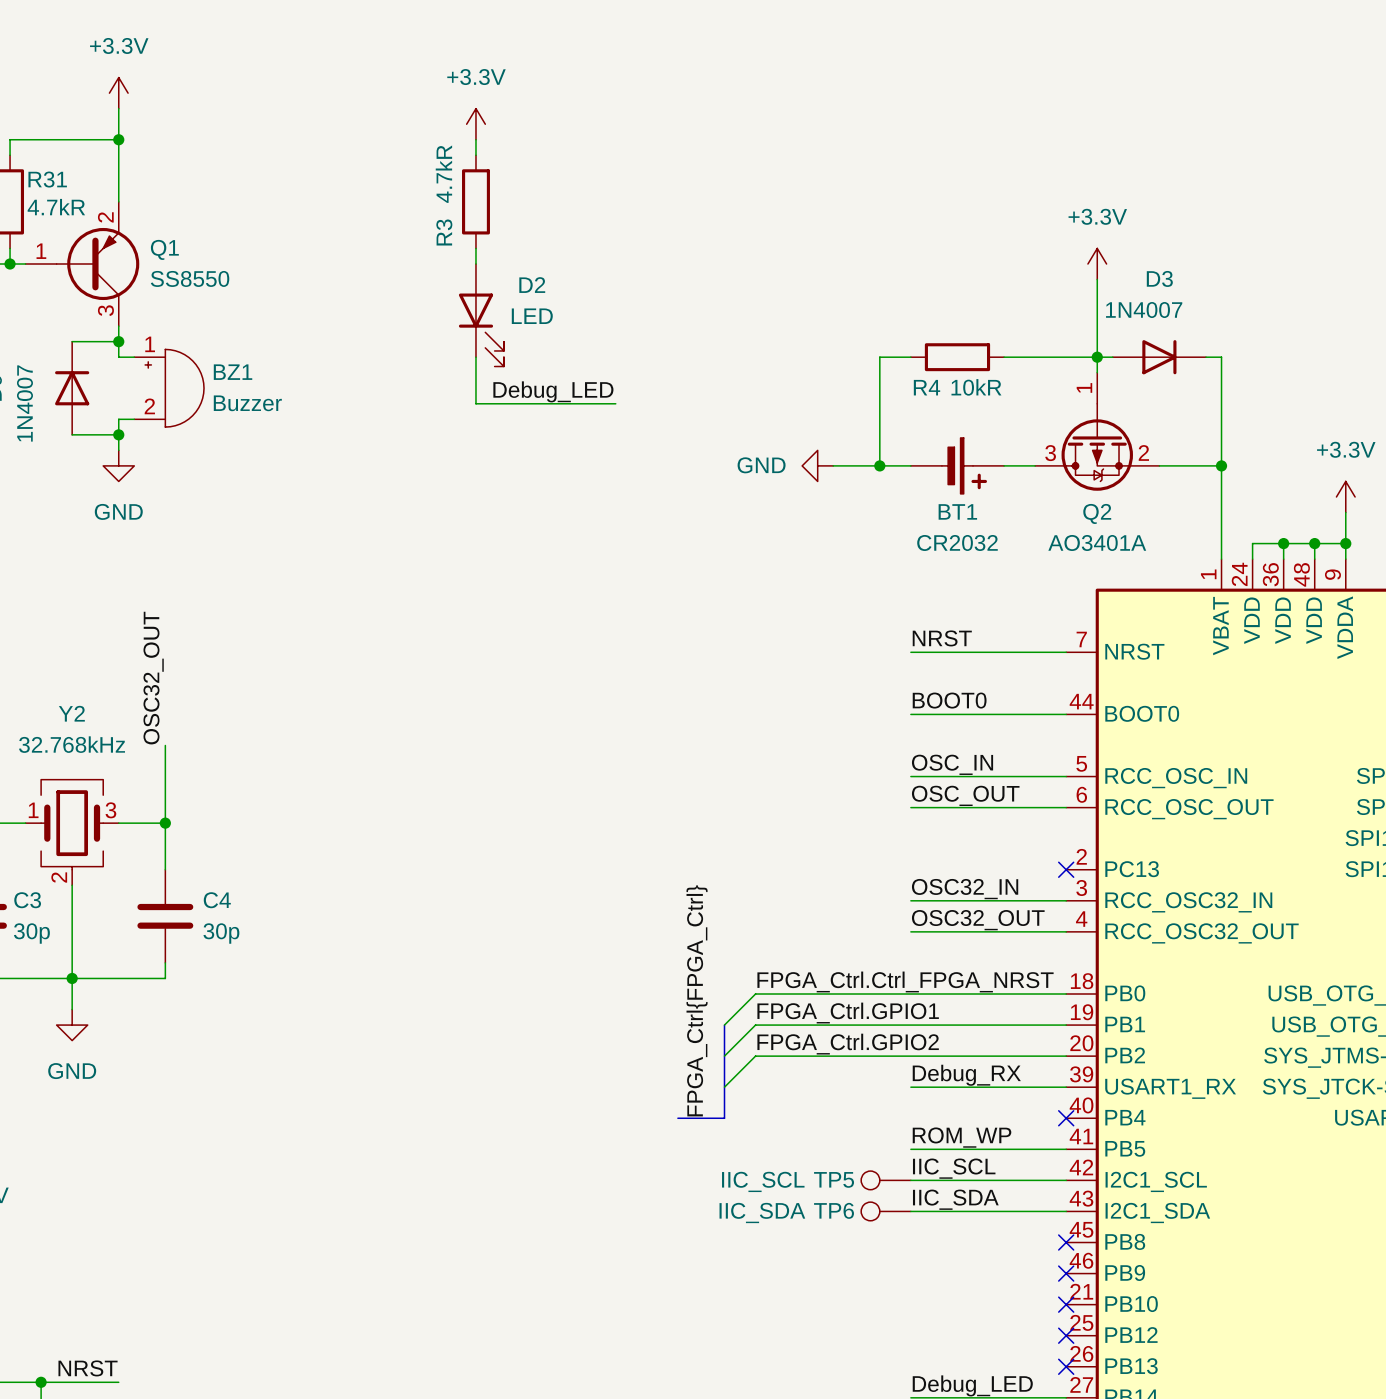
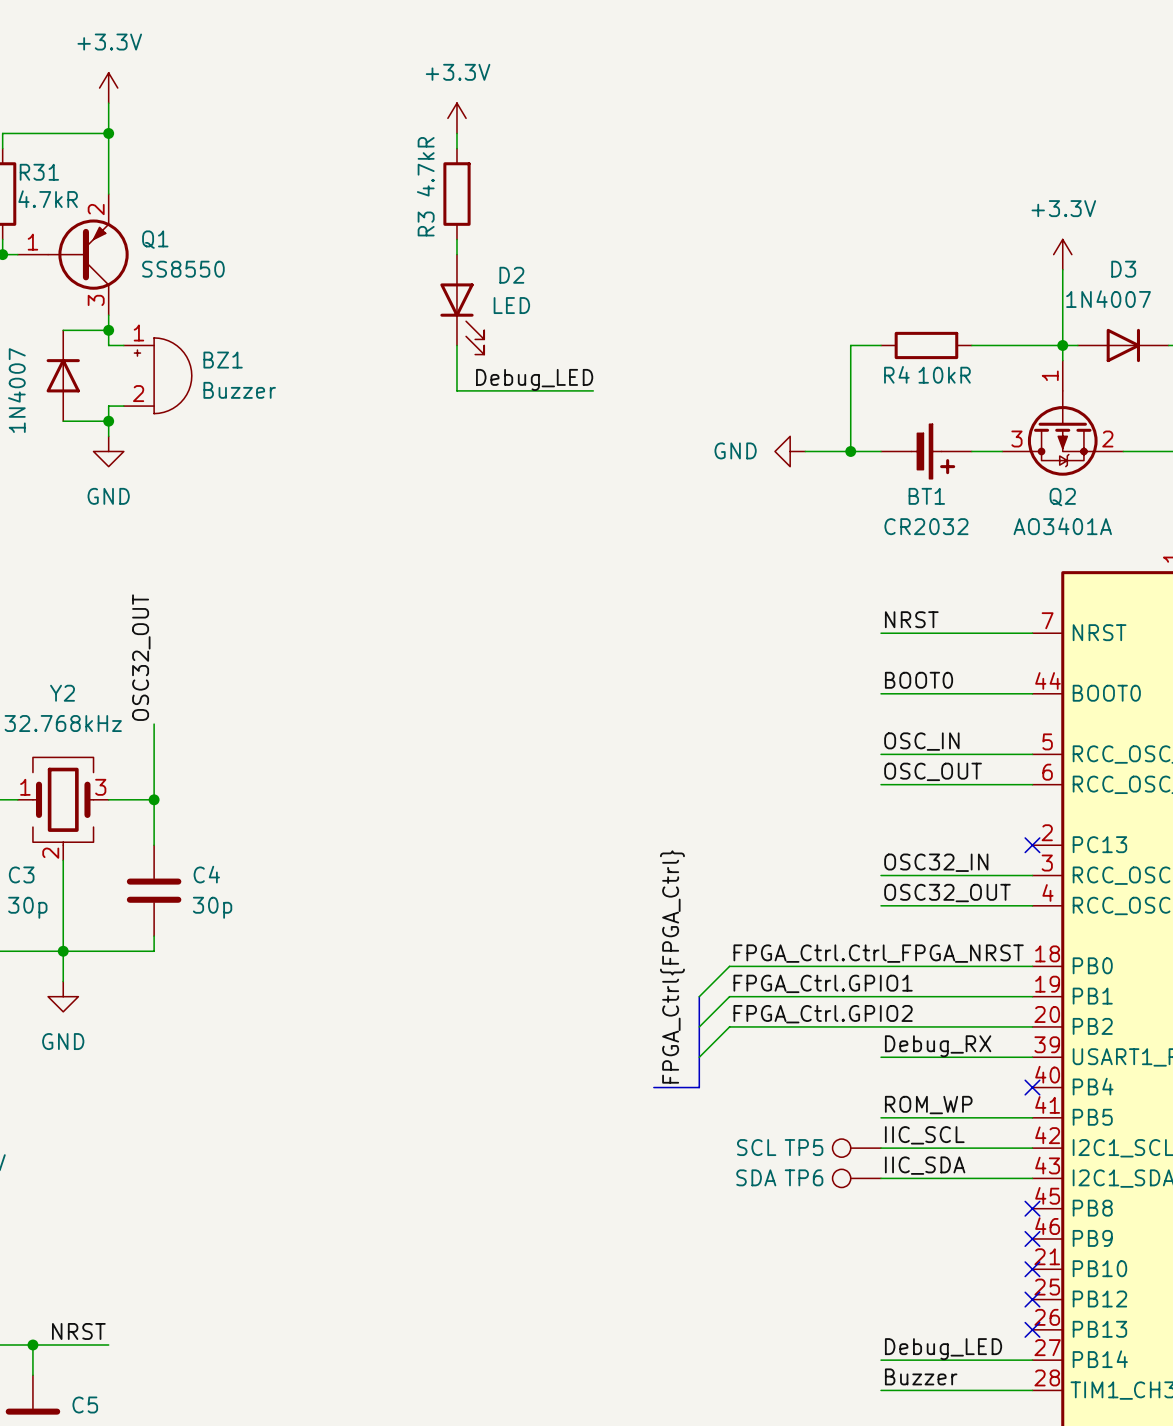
TP5 value: IIC_SCL (763, 1181) -> SCL (756, 1147)
TP6 value: IIC_SDA (762, 1212) -> SDA (756, 1177)

